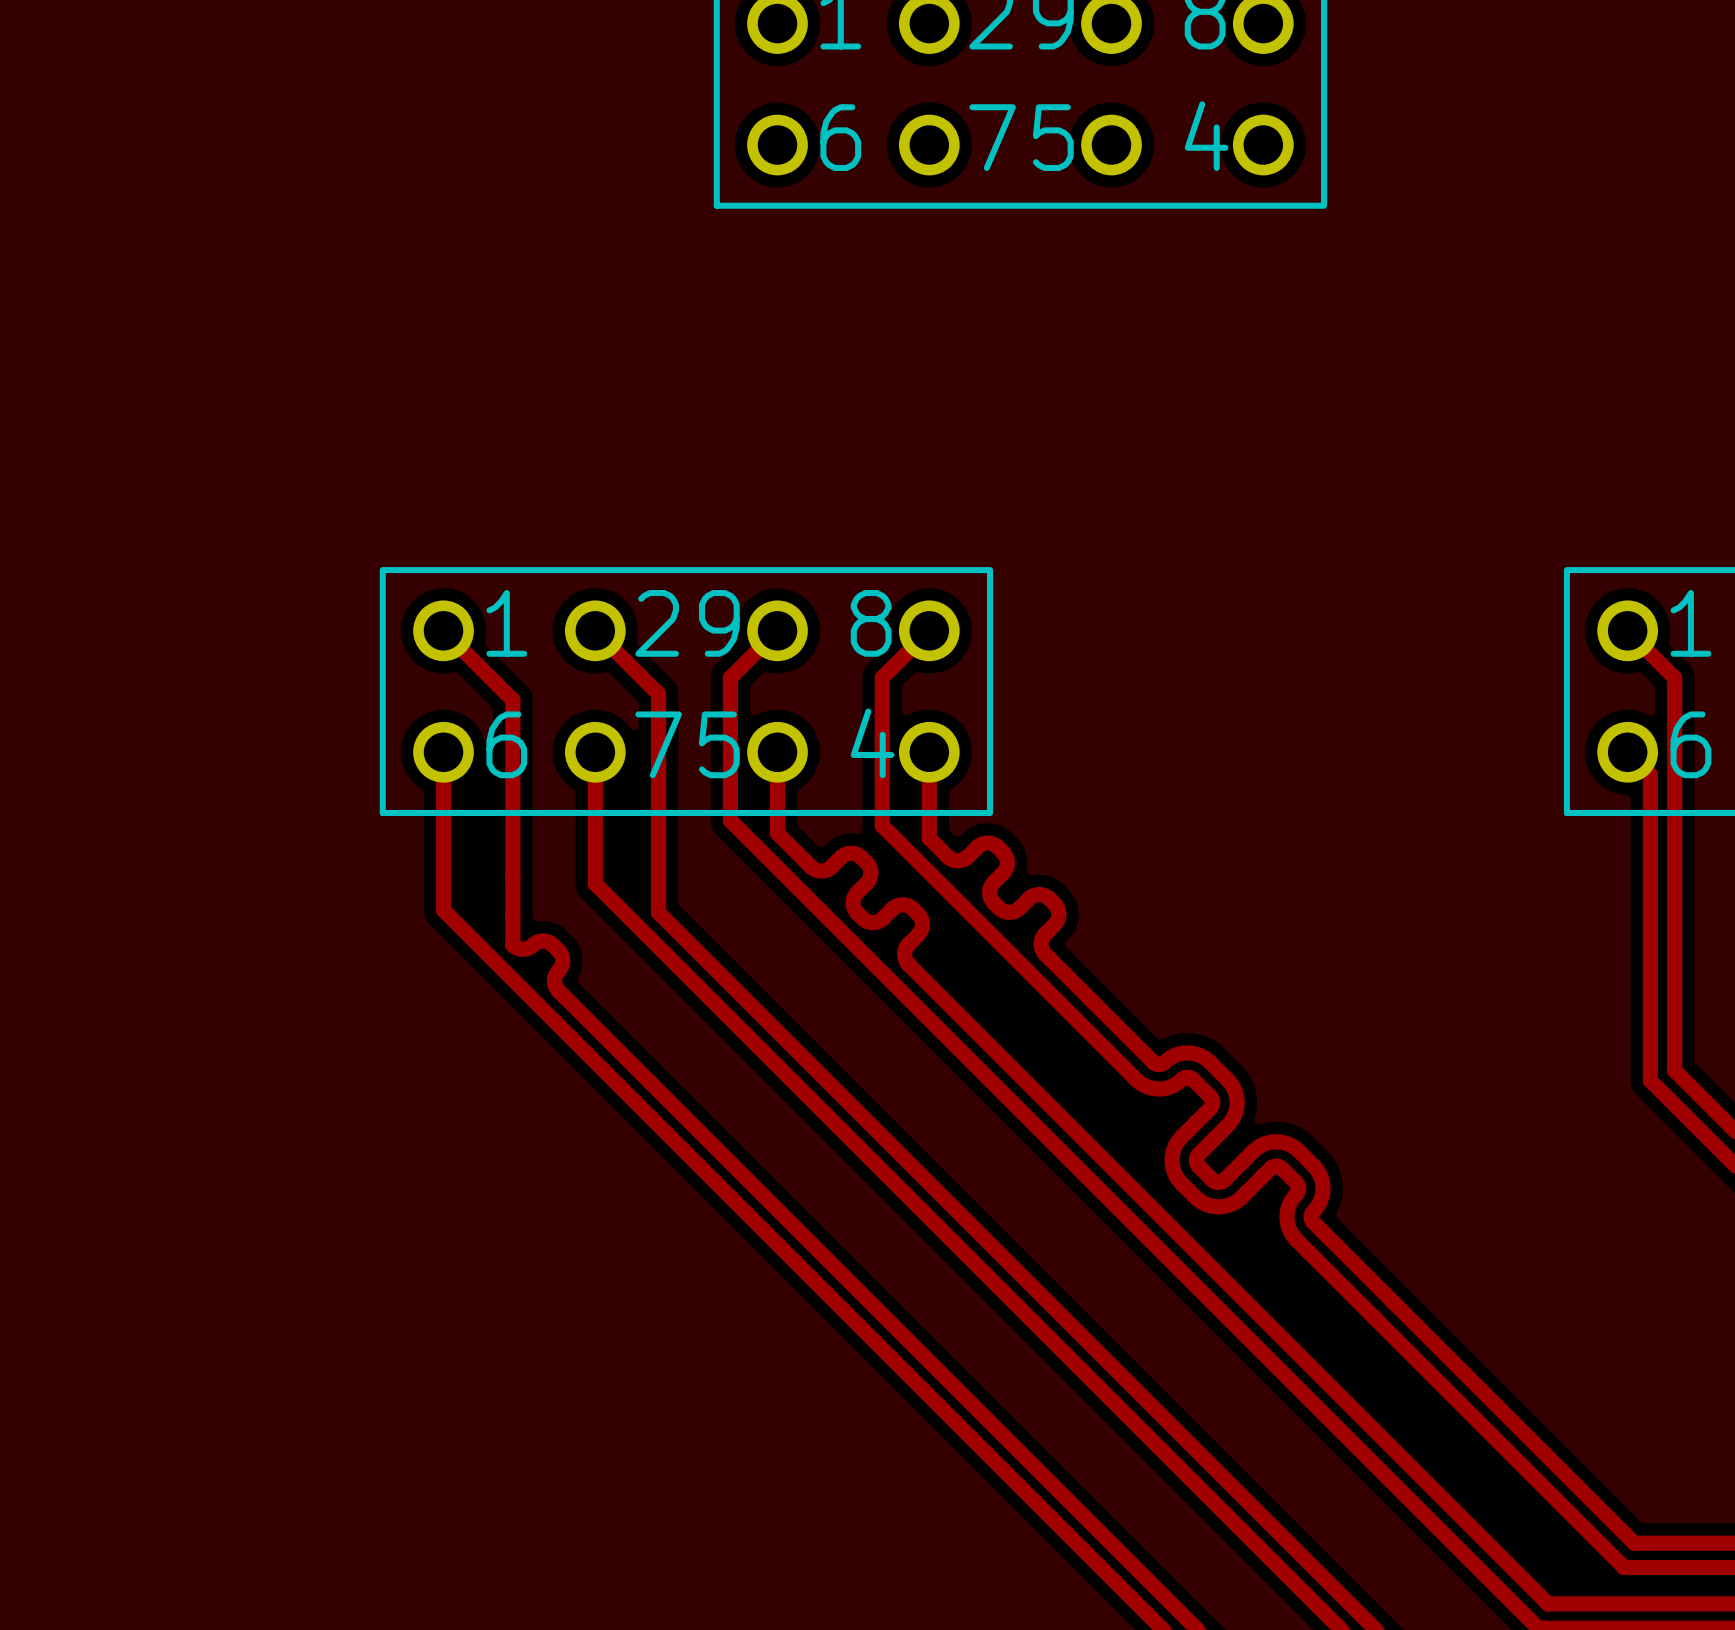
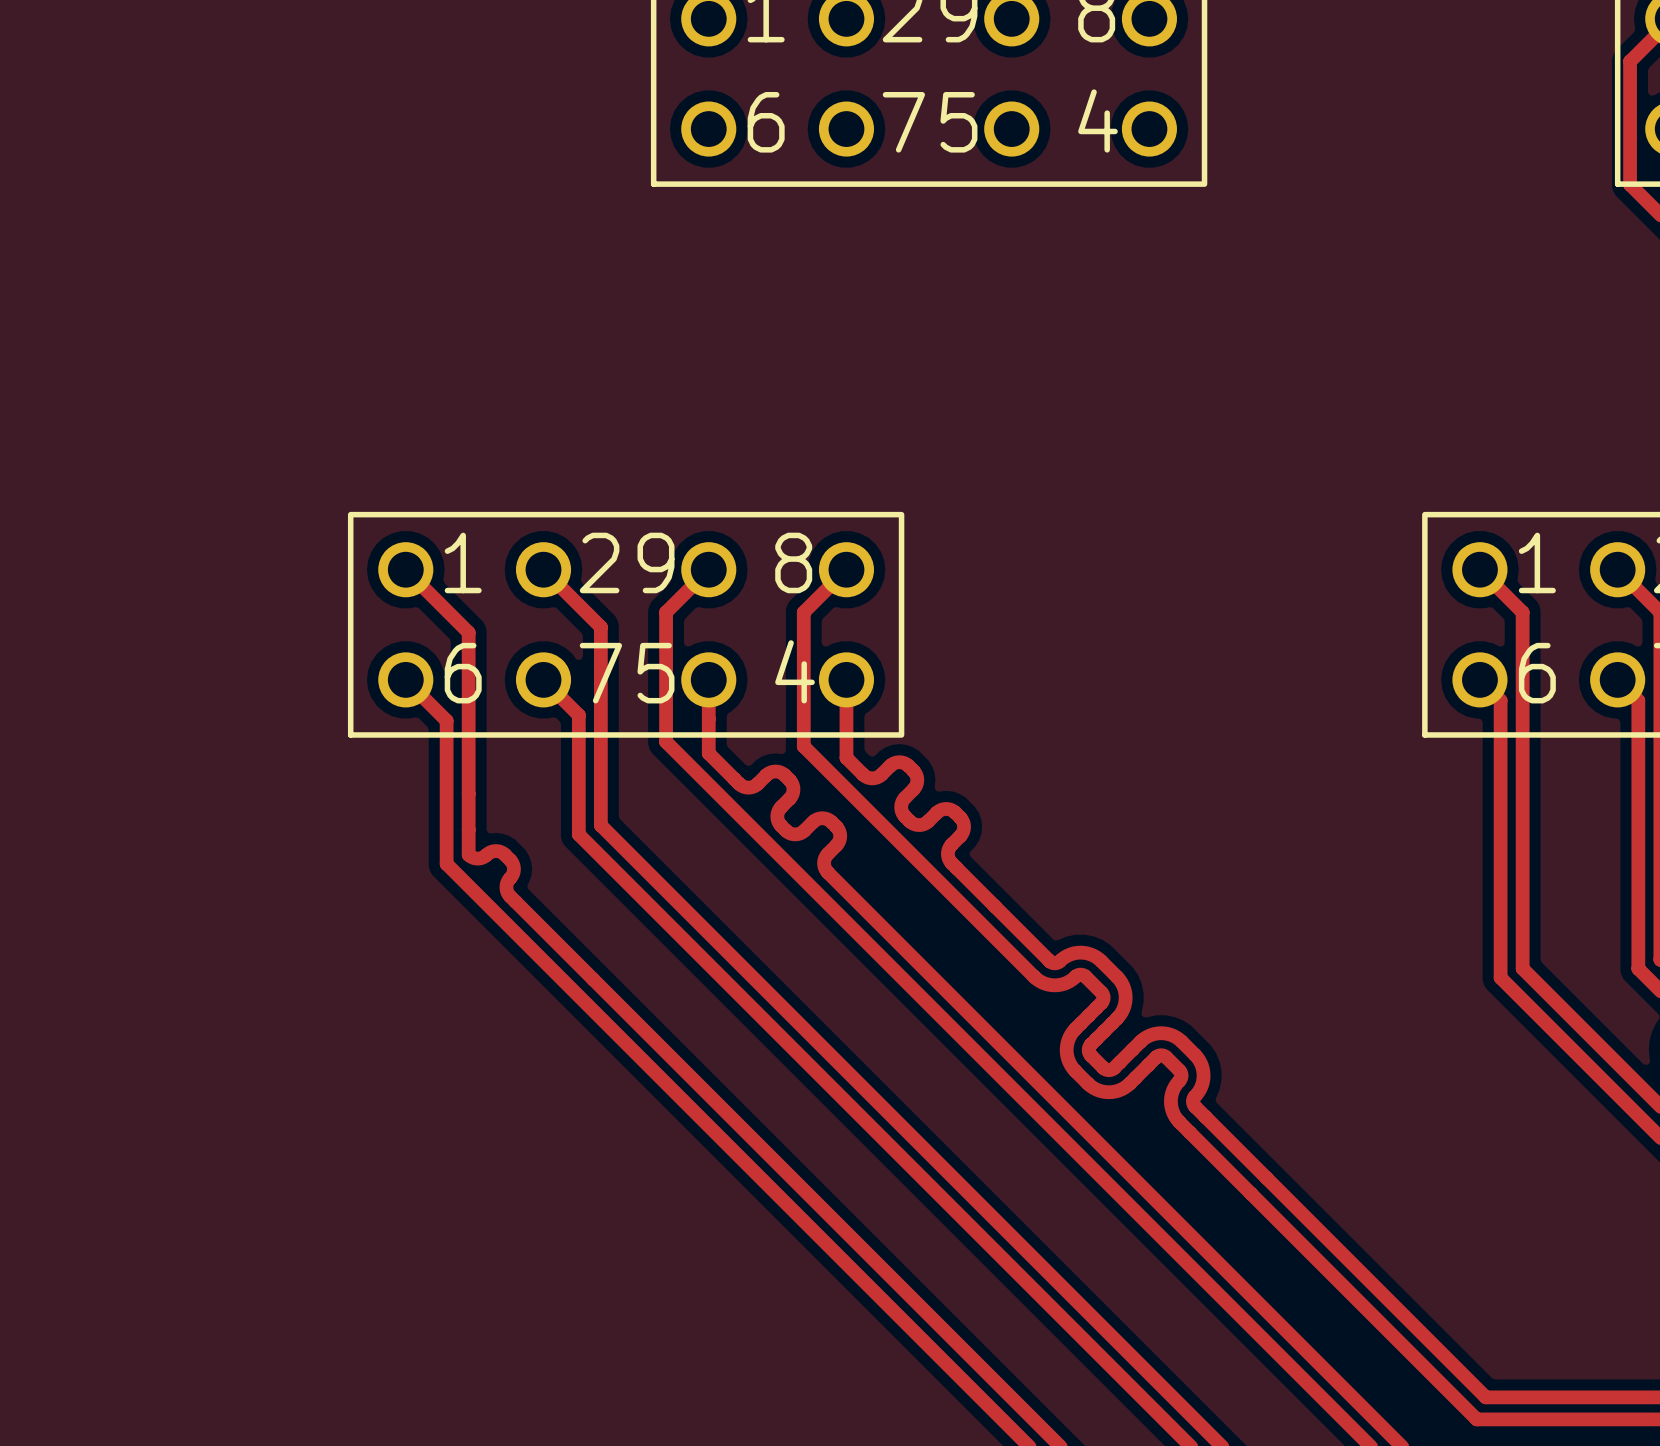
track: (443, 752) (443, 910) (488, 955) -> (405, 679) (446, 720) (446, 863)
track: (595, 752) (595, 883) (634, 922) -> (543, 679) (578, 715) (578, 834)

